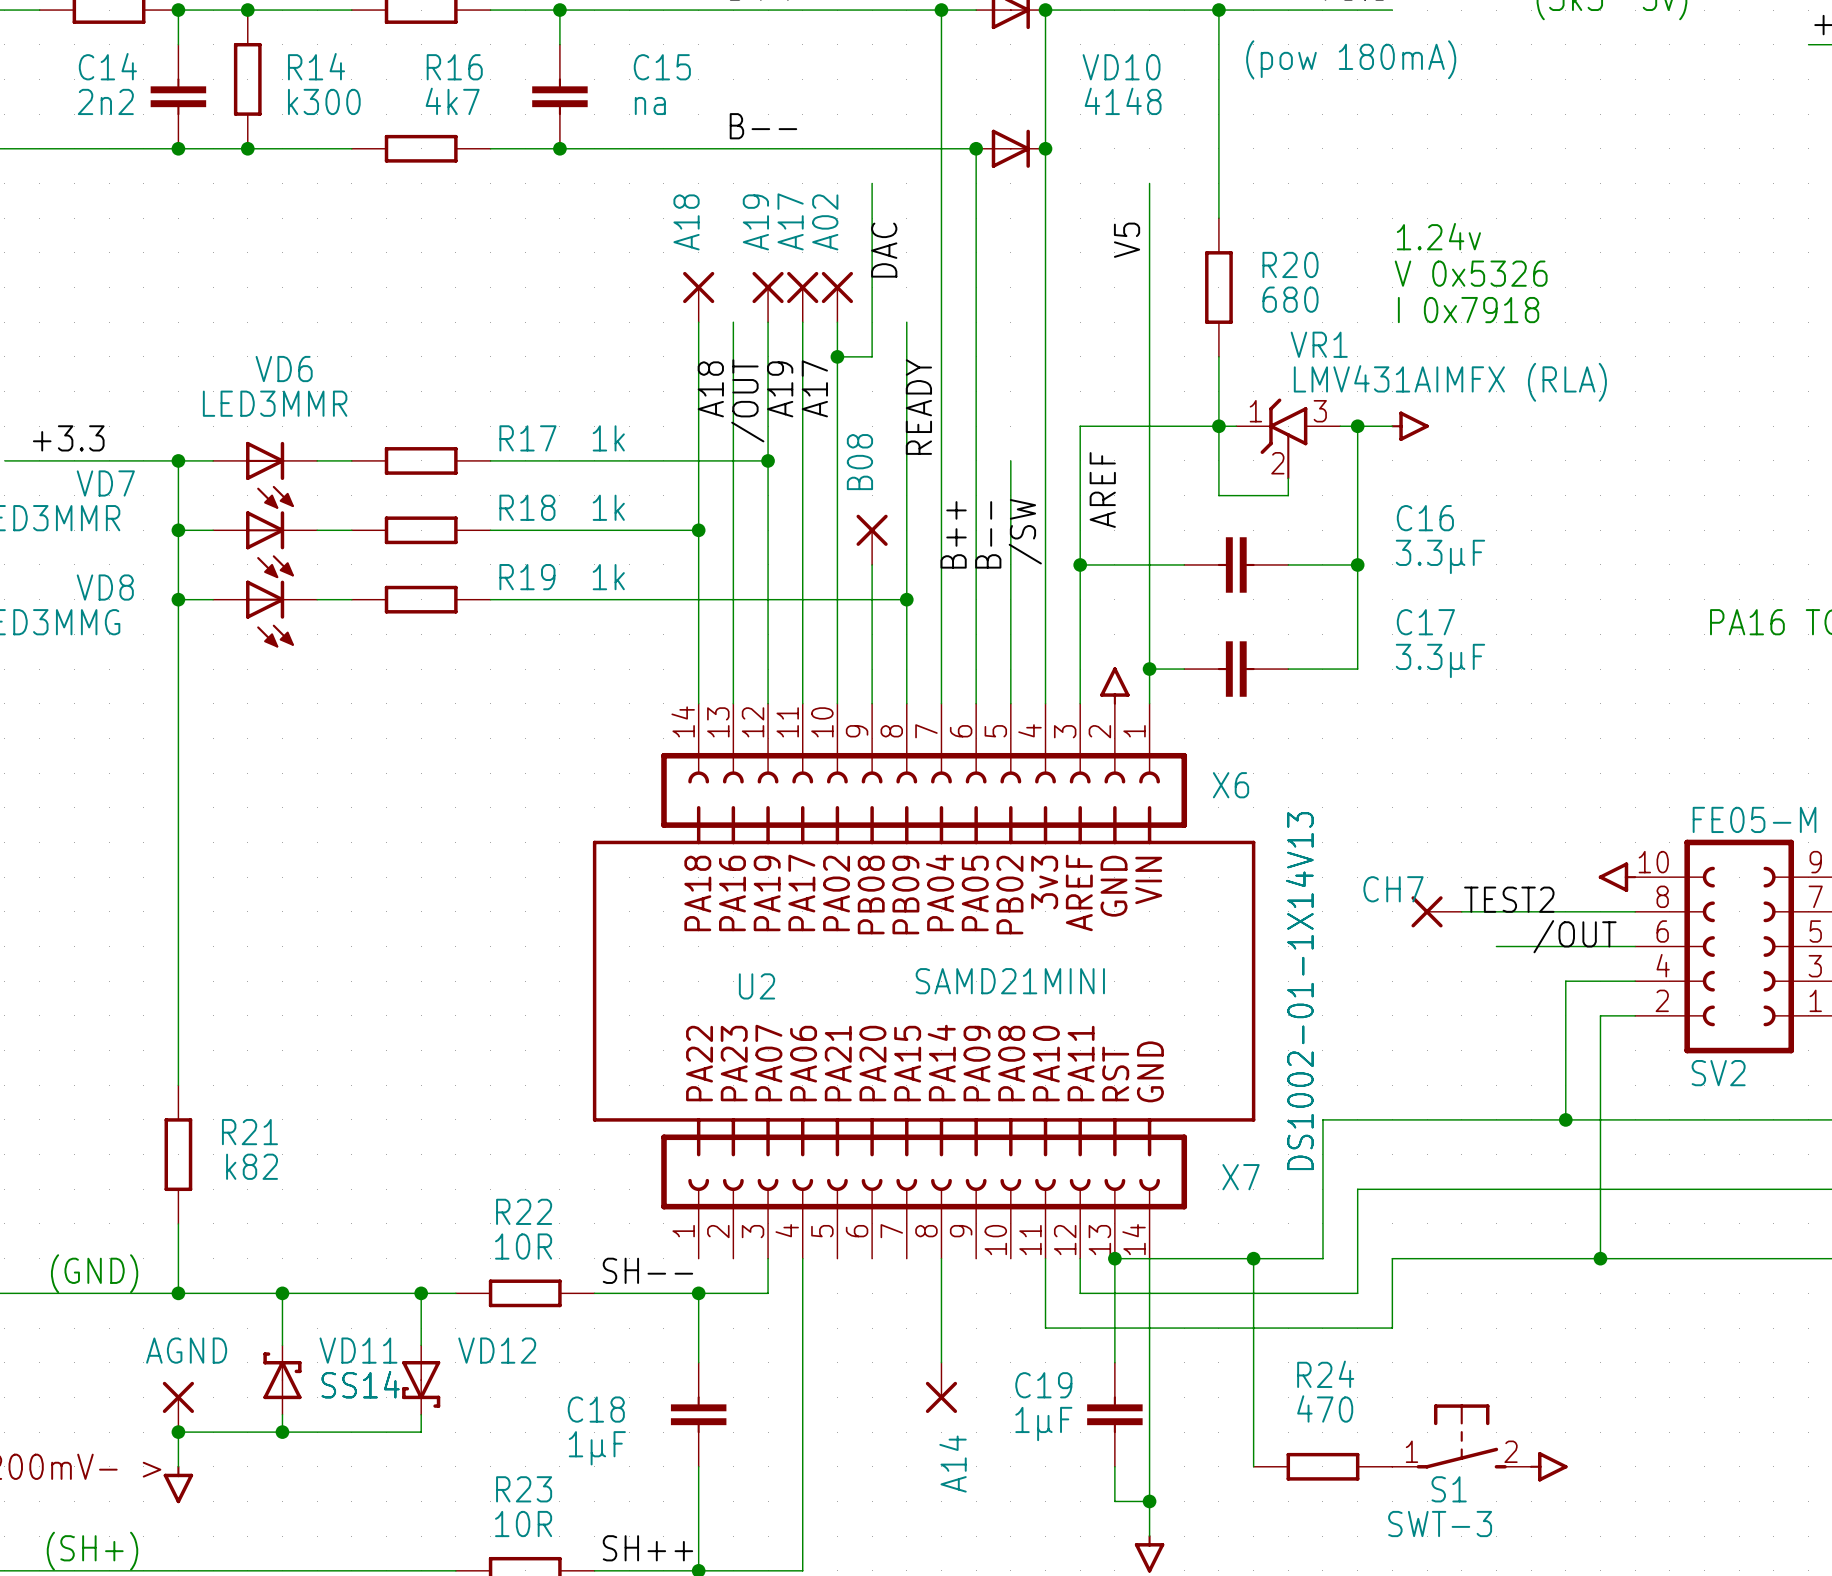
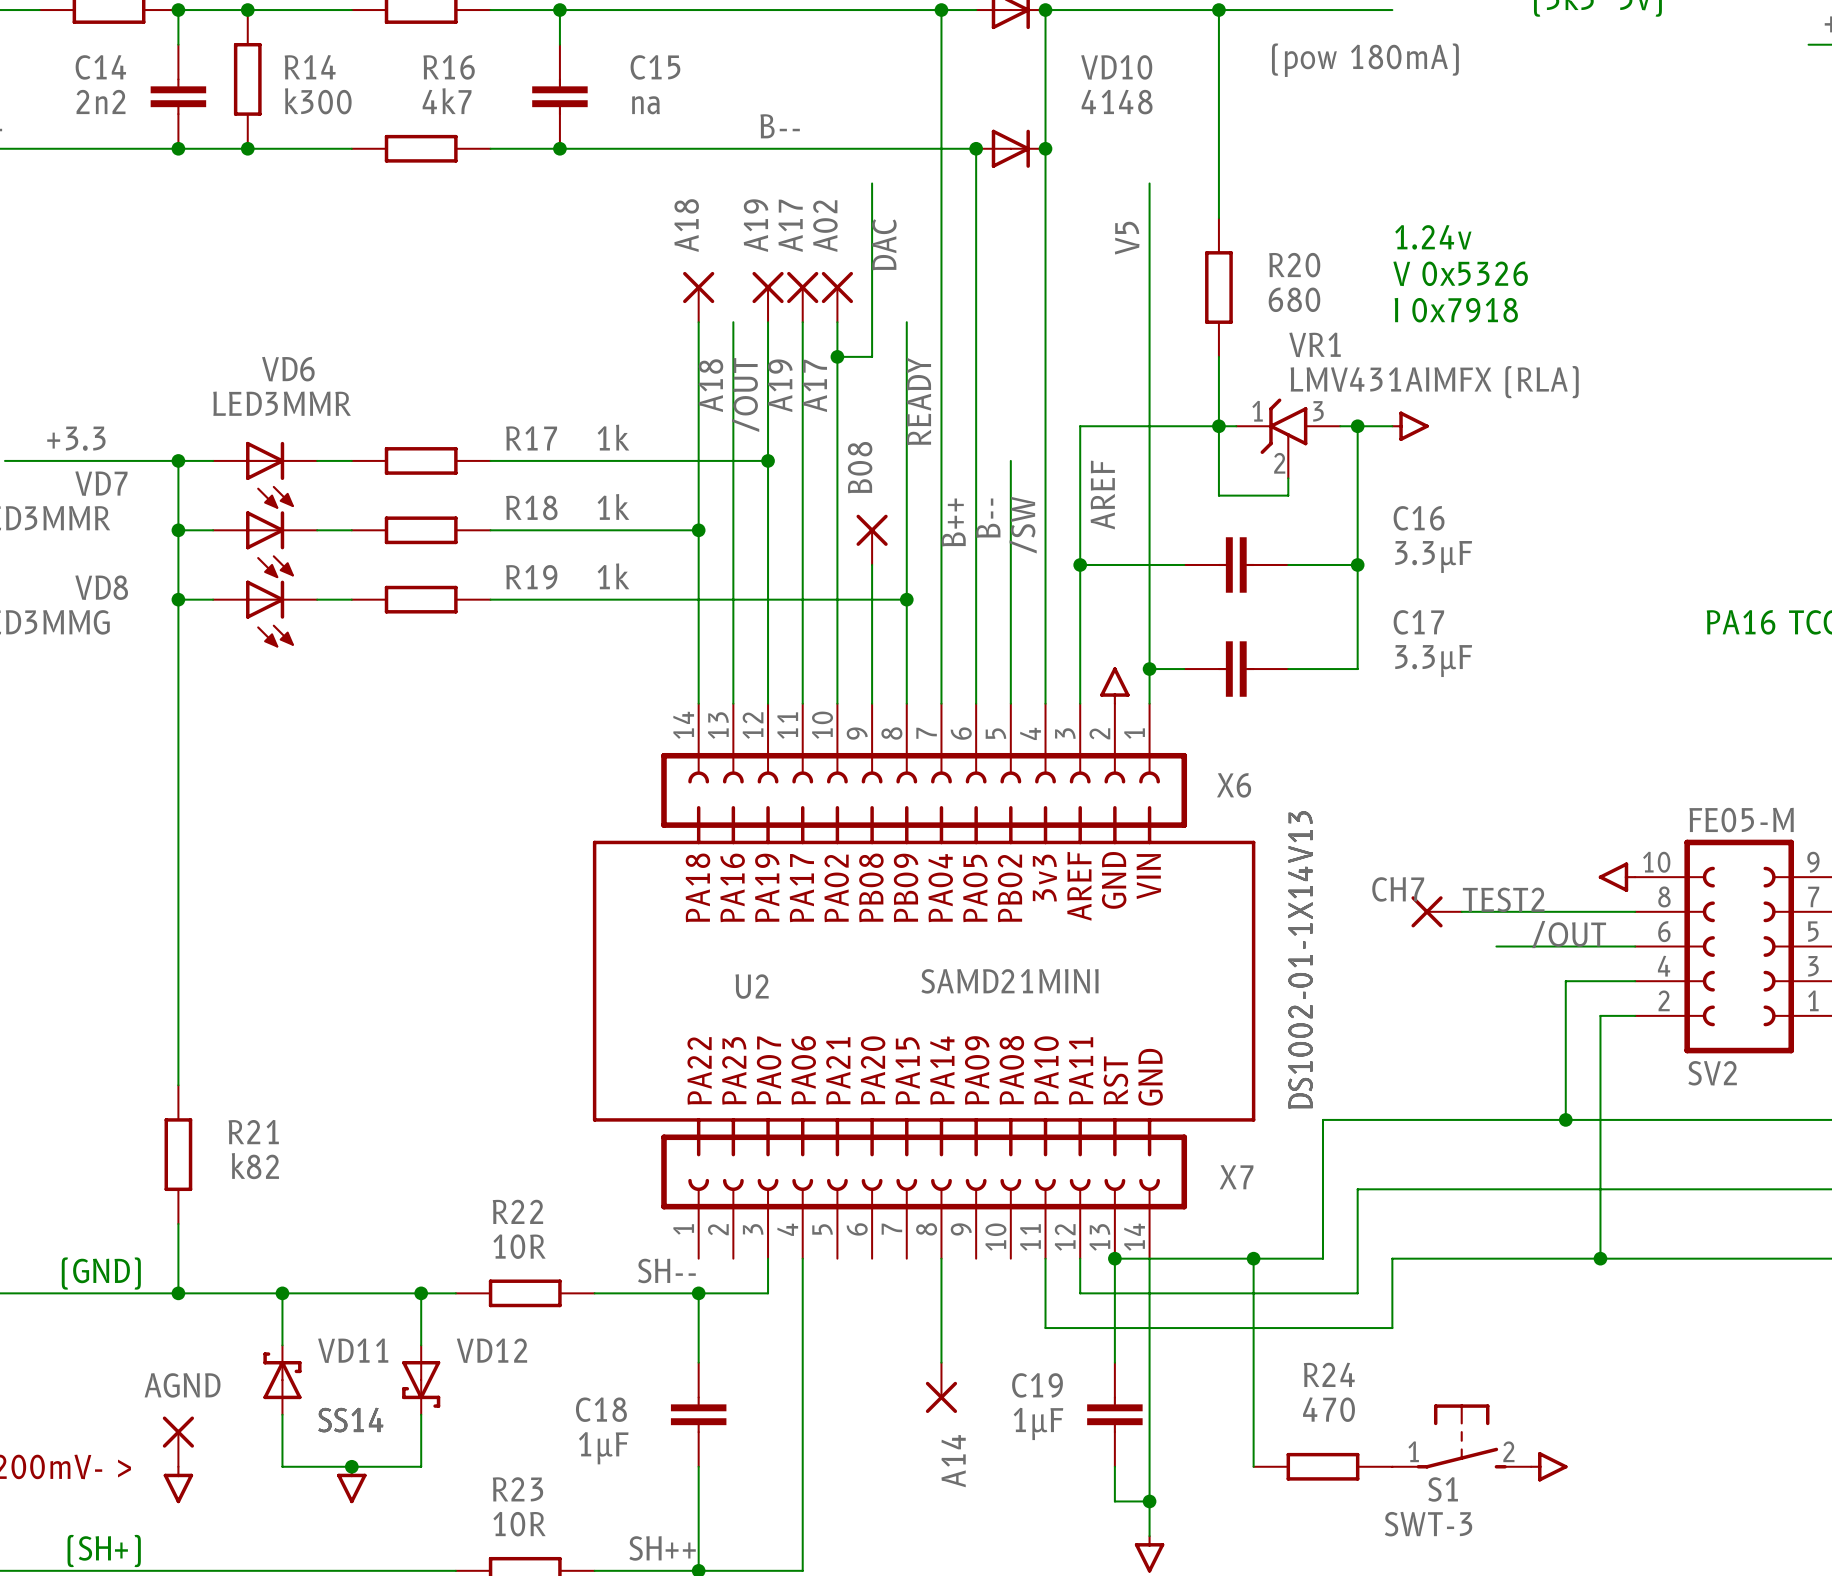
VD11 value position: SS14 (360, 1384) -> SS14 (350, 1420)
VD12 value position: SS14 (360, 1384) -> SS14 (350, 1420)
part position: (178, 1406) -> (178, 1441)
junction: (178, 1432) -> none
junction position: (282, 1432) -> (351, 1466)
wire: (421, 1432) (178, 1432) (178, 1466) -> (421, 1432) (421, 1466) (282, 1466) (282, 1432)
power symbol: none -> (351, 1484)

